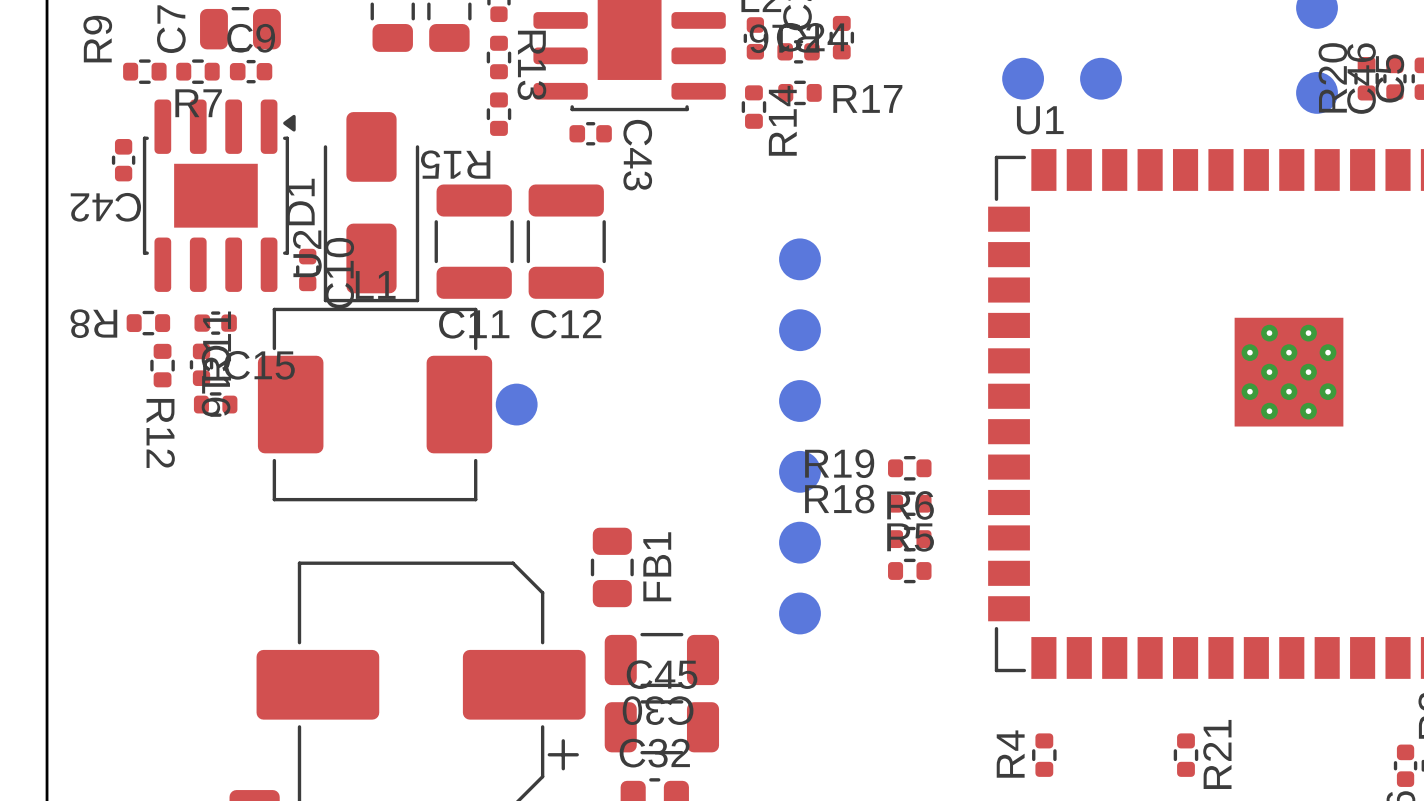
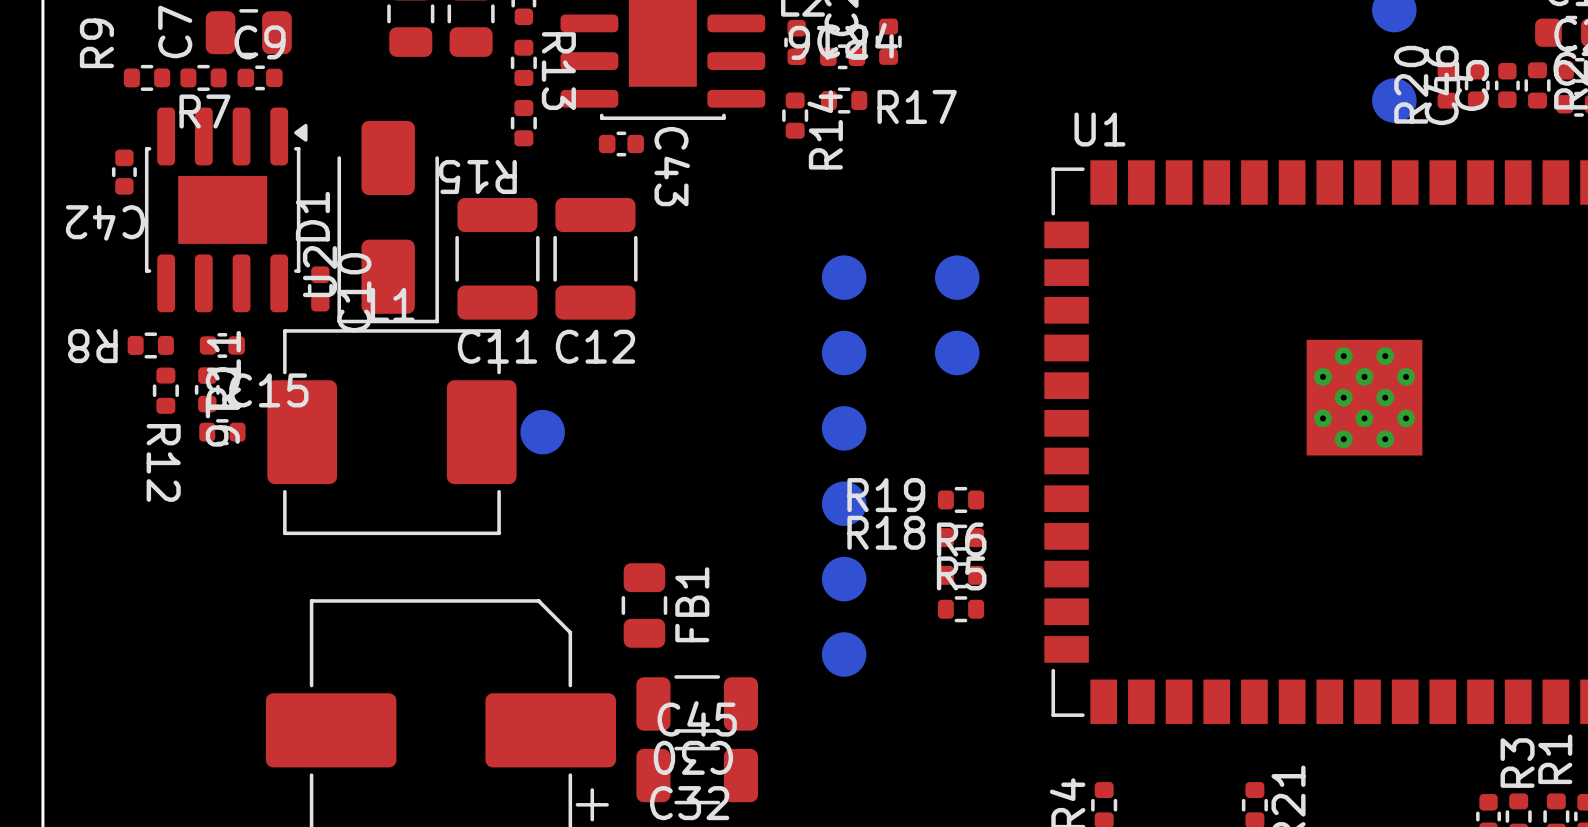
part: (1023, 78) -> none
part: (1100, 78) -> none
part: none -> (957, 277)
part: none -> (957, 353)

